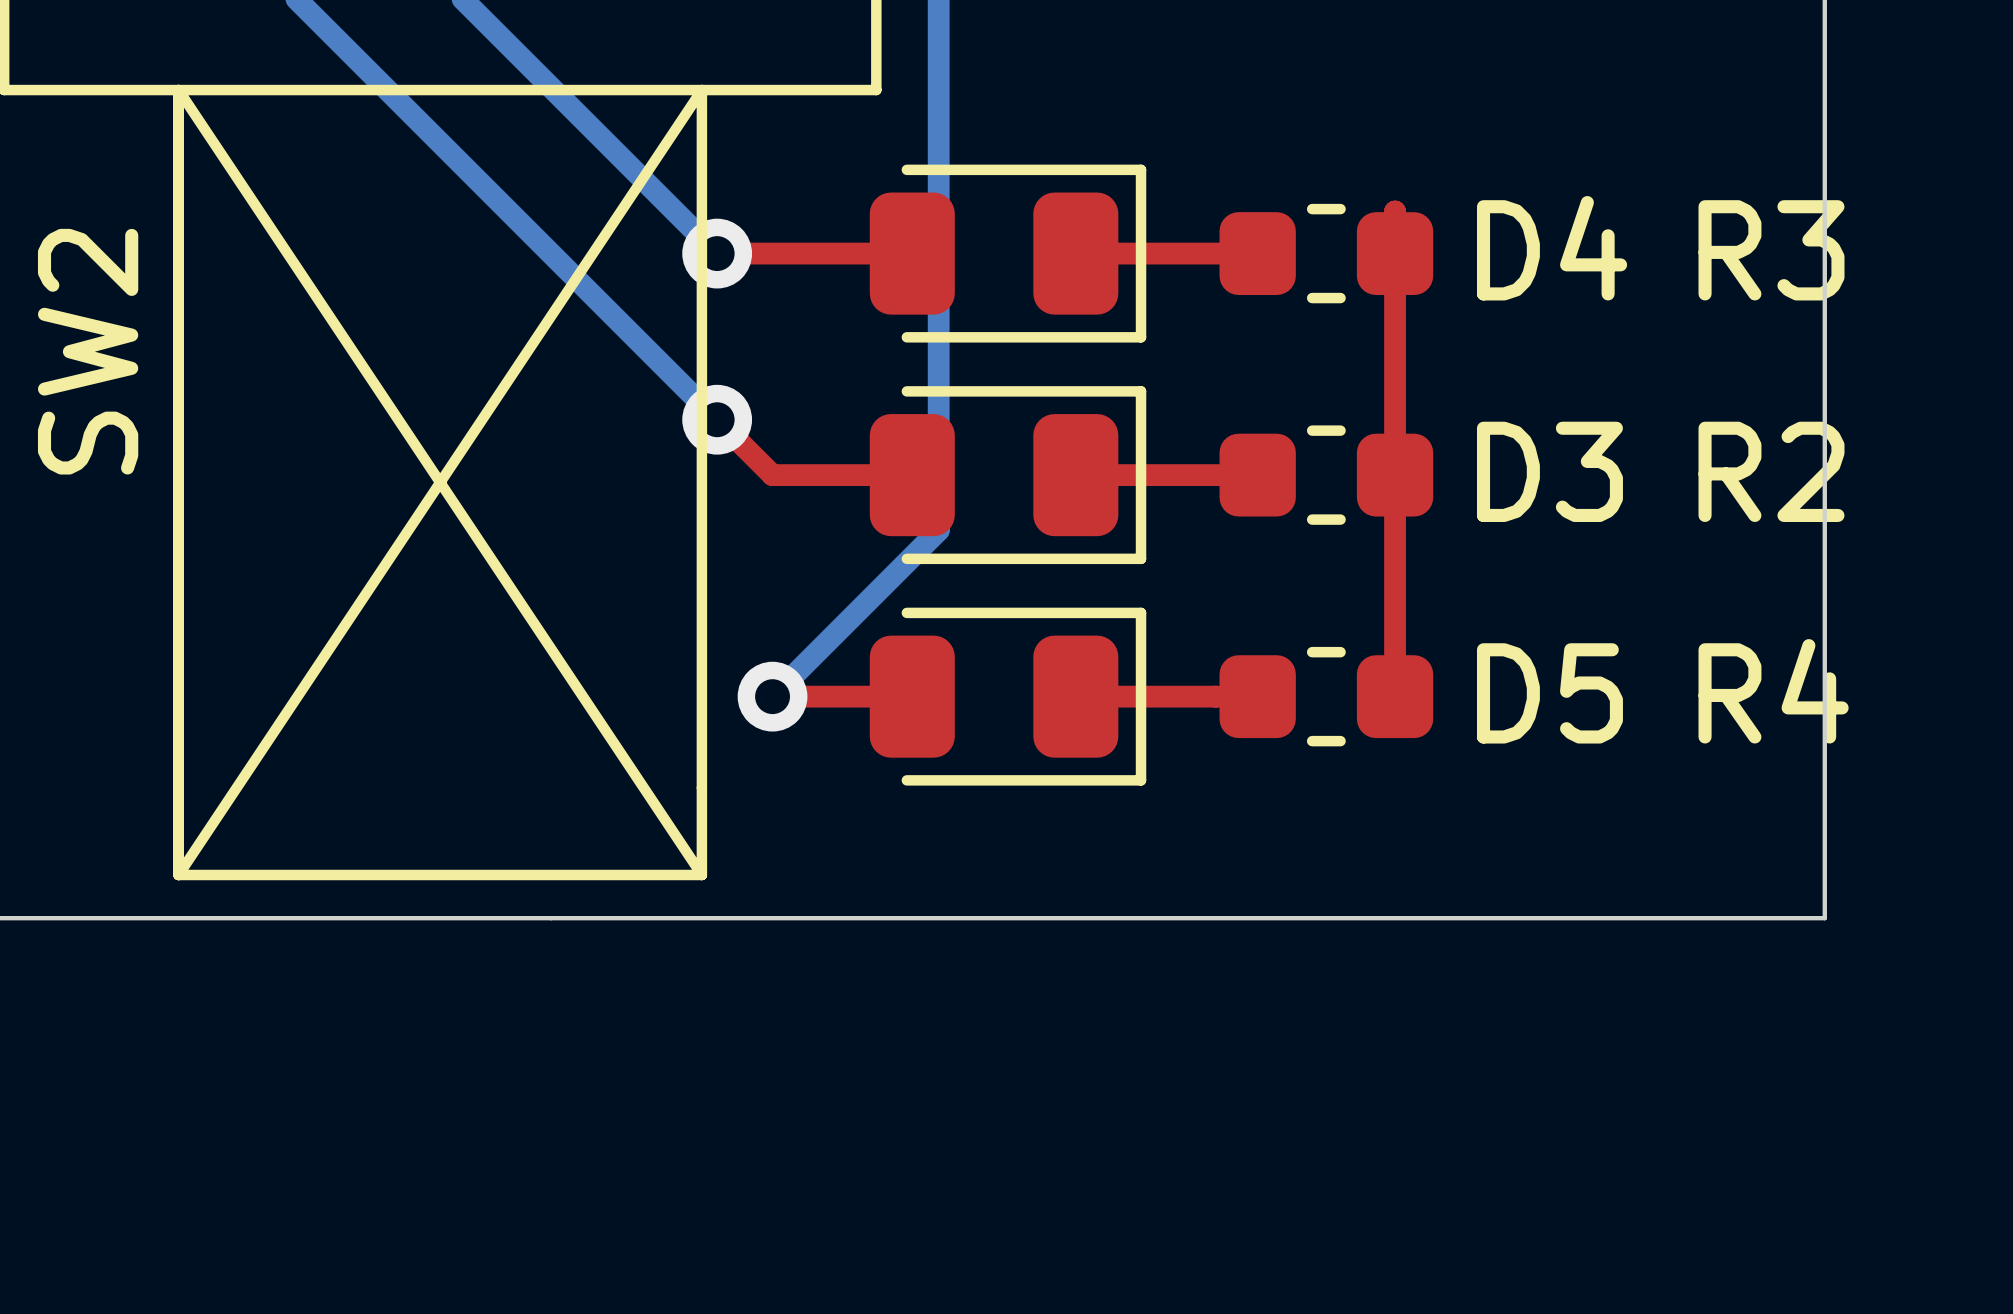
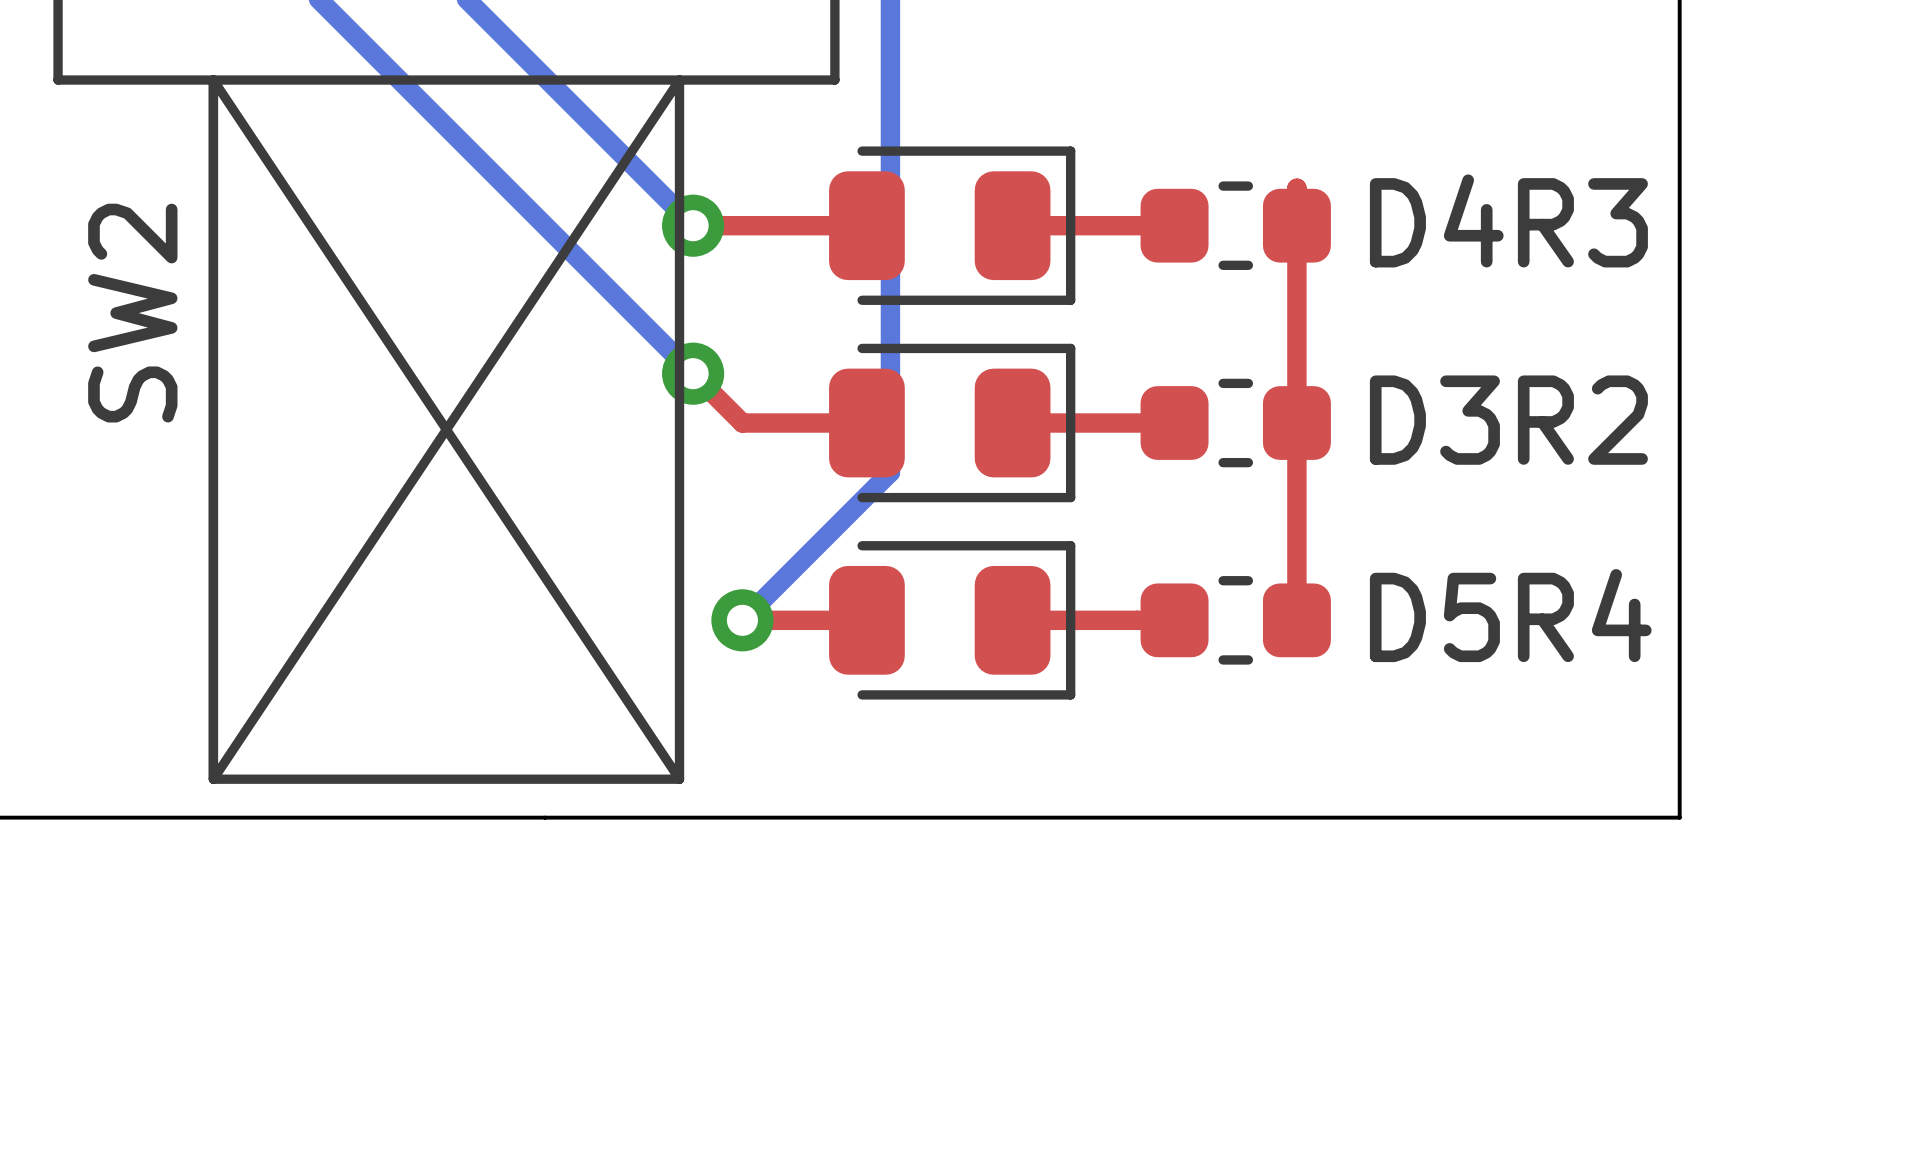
R3 name position: R3 (1771, 250) -> R3 (1582, 222)
R2 name position: R2 (1771, 471) -> R2 (1582, 420)
R4 name position: R4 (1773, 691) -> R4 (1584, 615)

